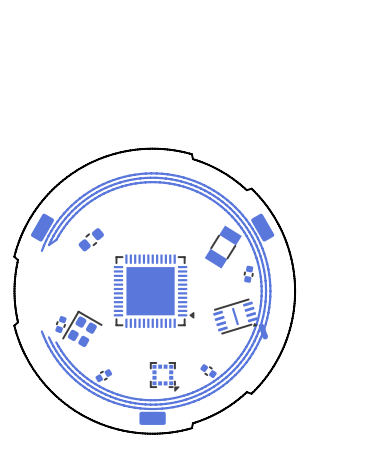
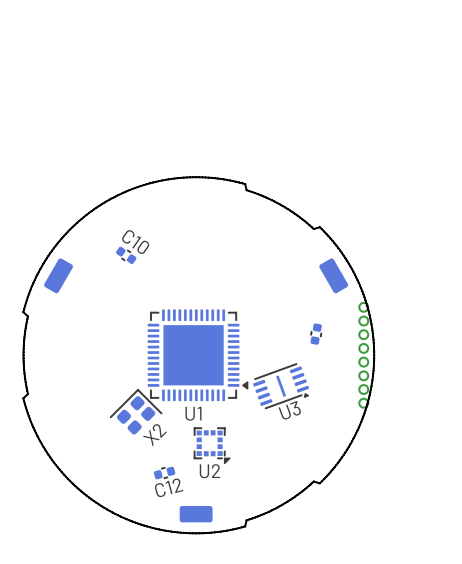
C10: none -> (126, 255)
part: (91, 239) -> none
part: (223, 247) -> none
track: (41, 250) (48, 235) (60, 217) (75, 201) (93, 189) (113, 180) (129, 175) (151, 173) (173, 175) (194, 180) (213, 190) (227, 200) (242, 215) (255, 233) (264, 253) (269, 274) (270, 291) (269, 307) (264, 328) (255, 348) (242, 366) (227, 382) (213, 391) (194, 401) (173, 407) (151, 409) (129, 406) (113, 402) (93, 393) (75, 380) (60, 364) (48, 346) (41, 331) -> none
part: none -> (363, 355)
U3: none -> (281, 386)
part: (235, 316) -> none
part: (60, 324) -> none
part: (82, 329) -> none
part: (263, 331) -> none
X2: none -> (136, 411)
track: (48, 337) (61, 359) (75, 374) (92, 387) (110, 396) (130, 402) (155, 404) (176, 402) (200, 394) (218, 383) (237, 366) (252, 345) (260, 326) (265, 301) (265, 280) (261, 260) (252, 236) (240, 219) (222, 201) (200, 188) (181, 181) (155, 177) (135, 179) (115, 184) (96, 192) (68, 214) (48, 245) (56, 239) (66, 223) (80, 209) (95, 198) (112, 189) (131, 184) (150, 182) (169, 183) (188, 188) (205, 195) (221, 206) (235, 220) (249, 240) (256, 257) (261, 281) (261, 300) (257, 319) (244, 350) (221, 375) (197, 390) (164, 399) (131, 398) (103, 388) (76, 369) (56, 342) -> none
U1 name: none -> U1 (193, 413)
U2: none -> (212, 445)
part: (208, 371) -> none
part: (103, 375) -> none
part: (164, 377) -> none
C12: none -> (164, 473)

